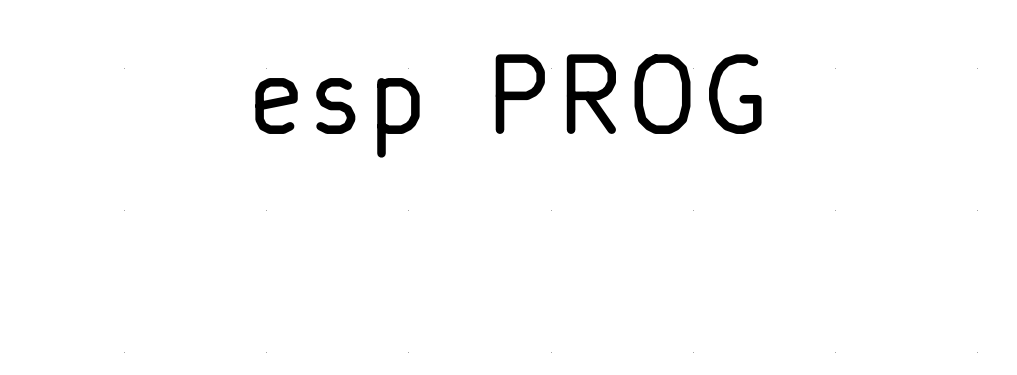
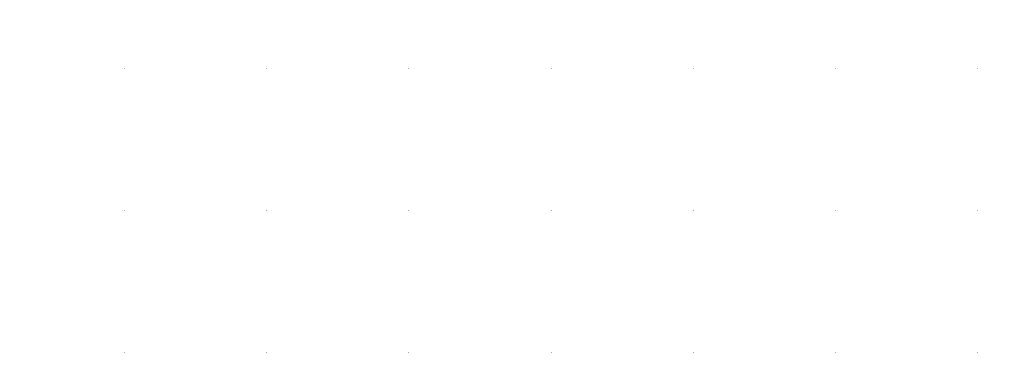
text: esp PROG (508, 106) -> none

